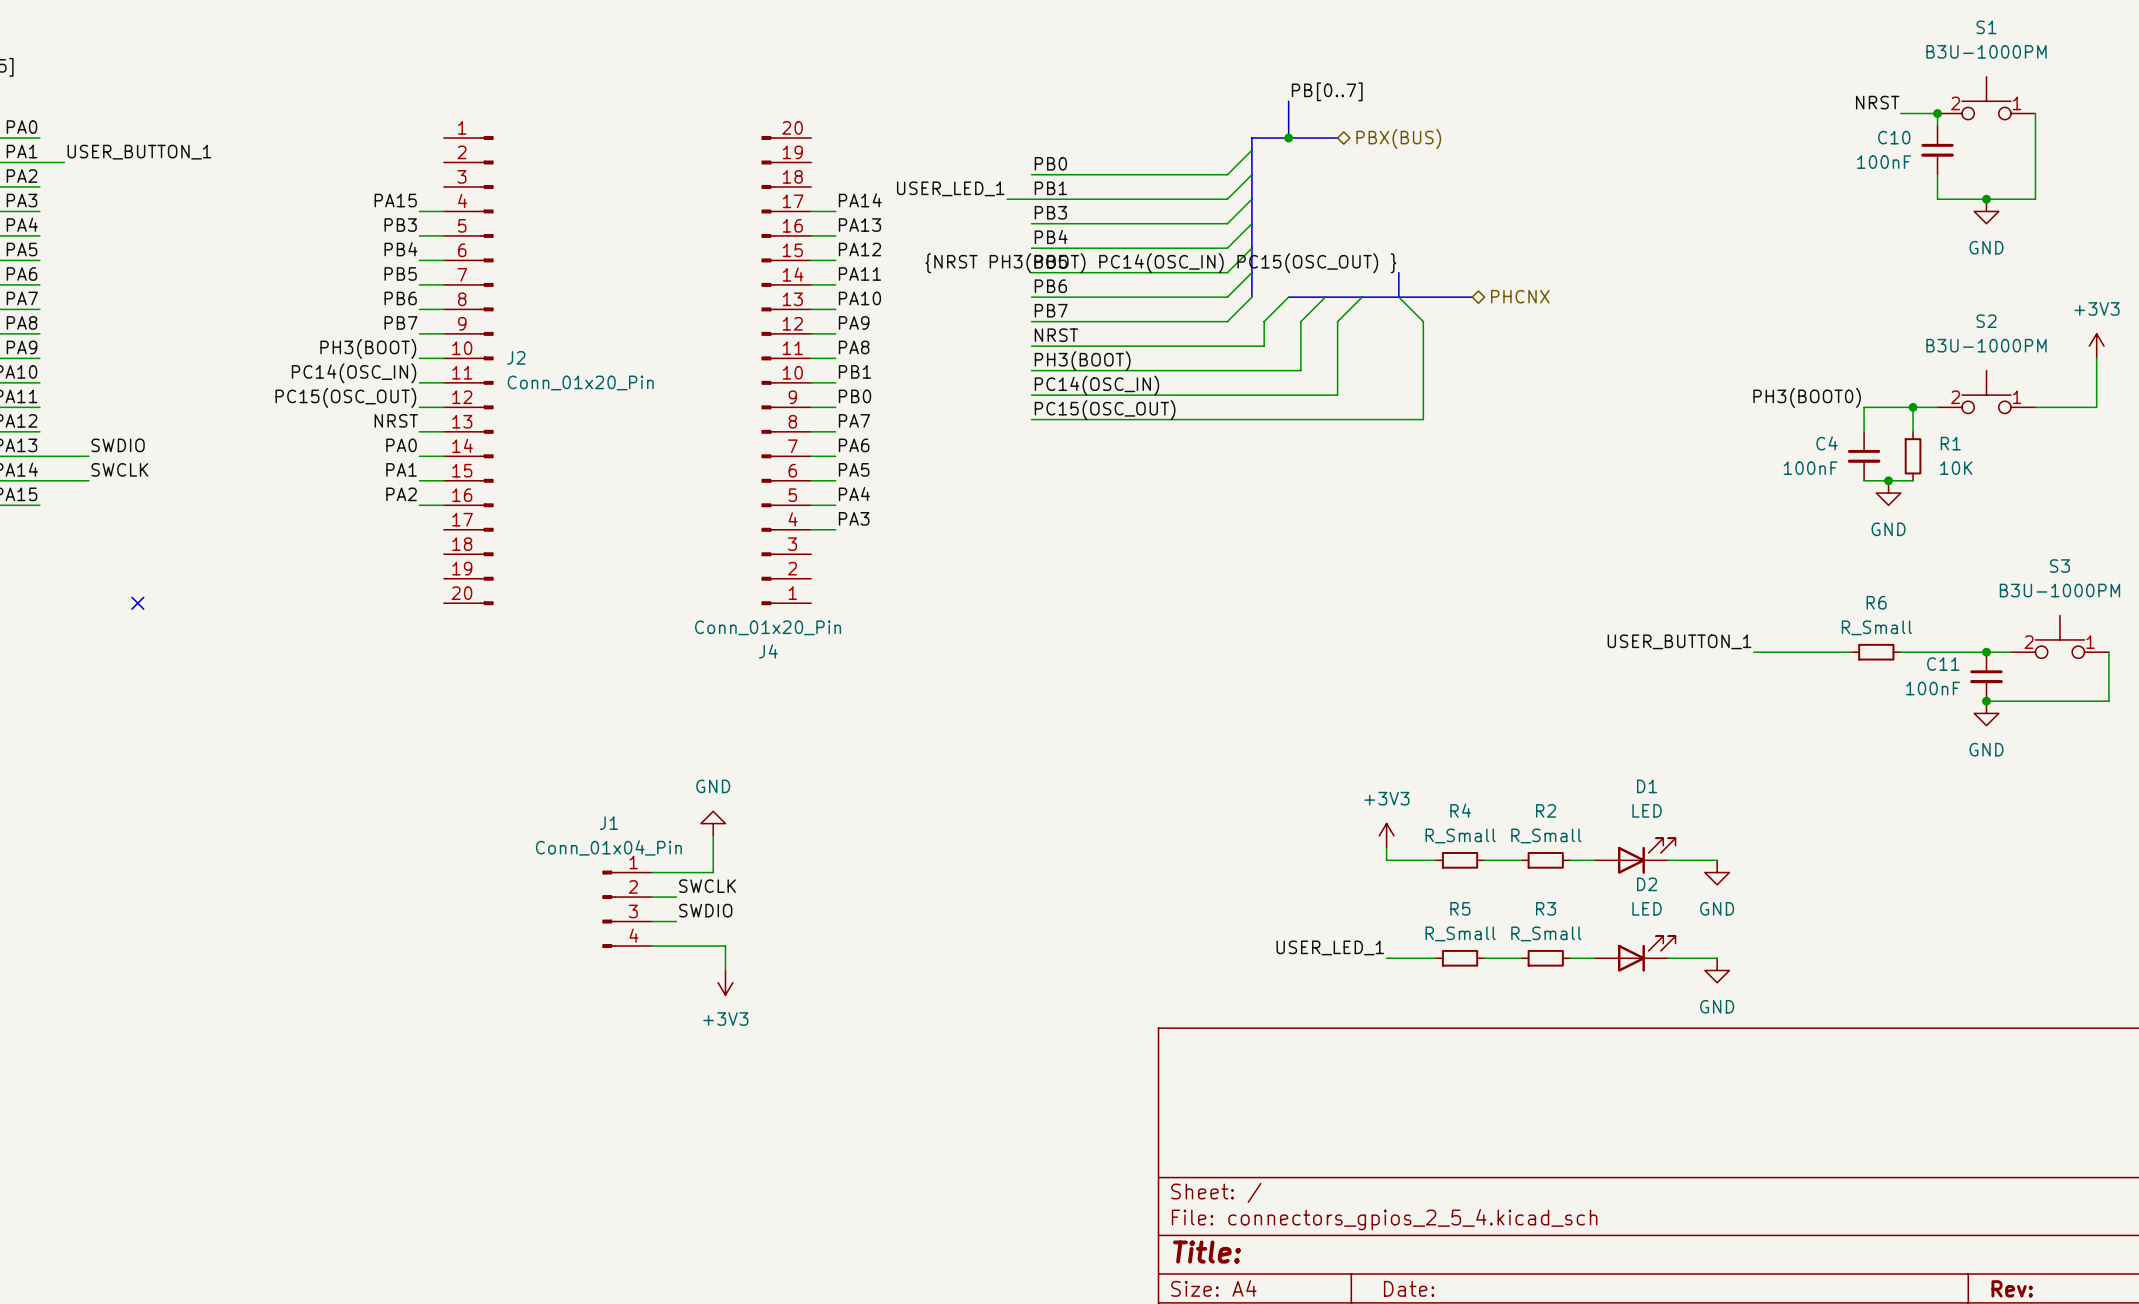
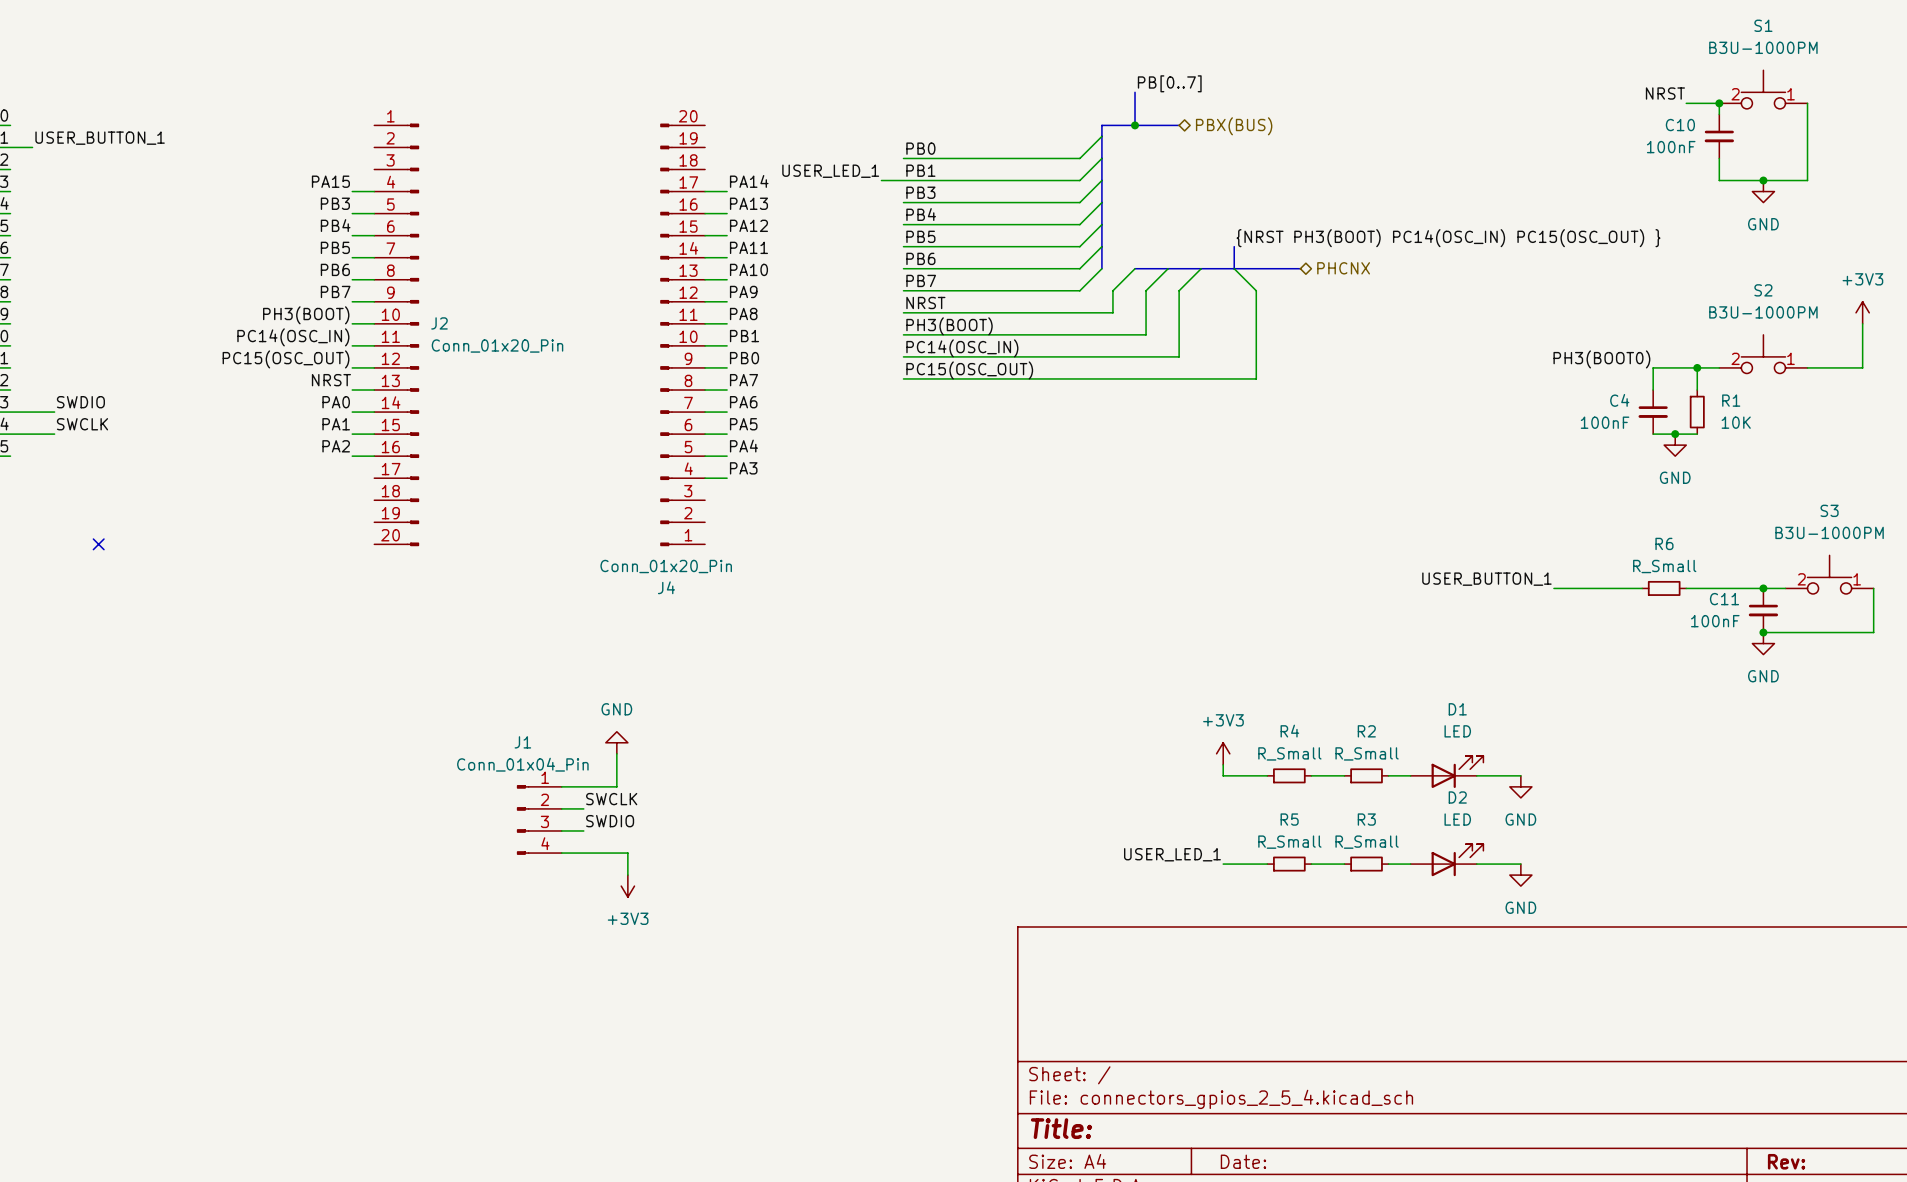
label position: {NRST PH3(BOOT) PC14(OSC_IN) PC15(OSC_OUT) } (1160, 263) -> {NRST PH3(BOOT) PC14(OSC_IN) PC15(OSC_OUT) } (1448, 238)

